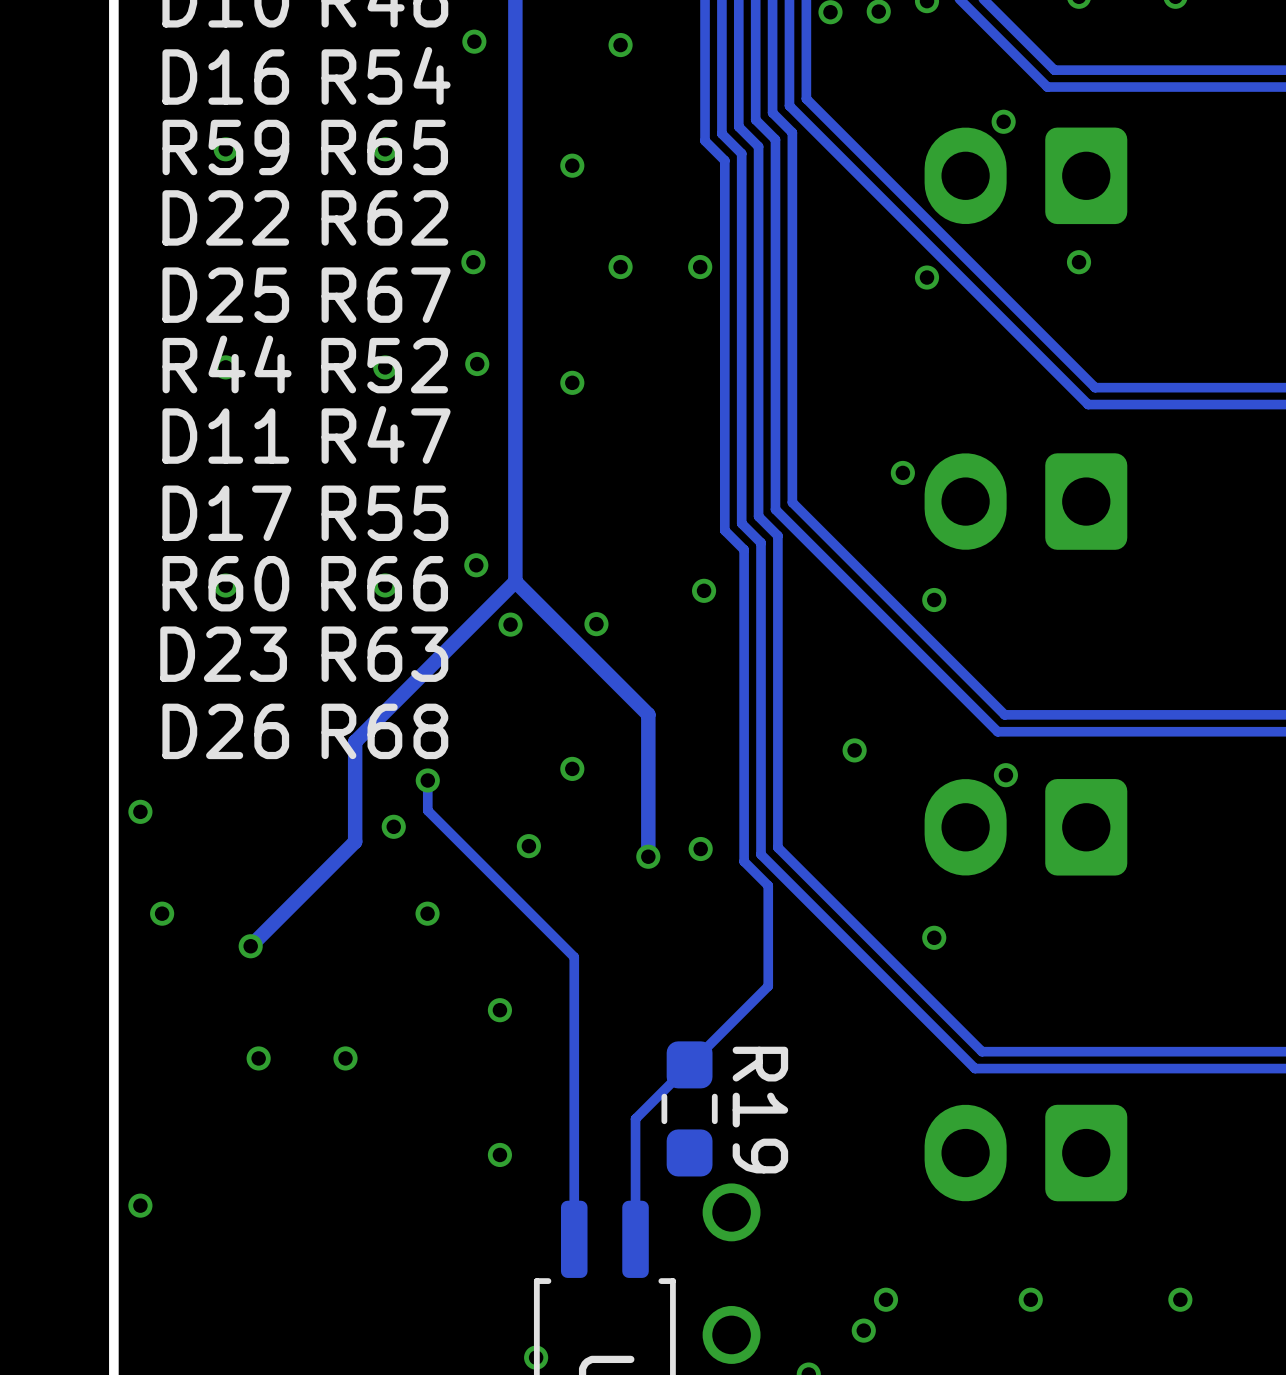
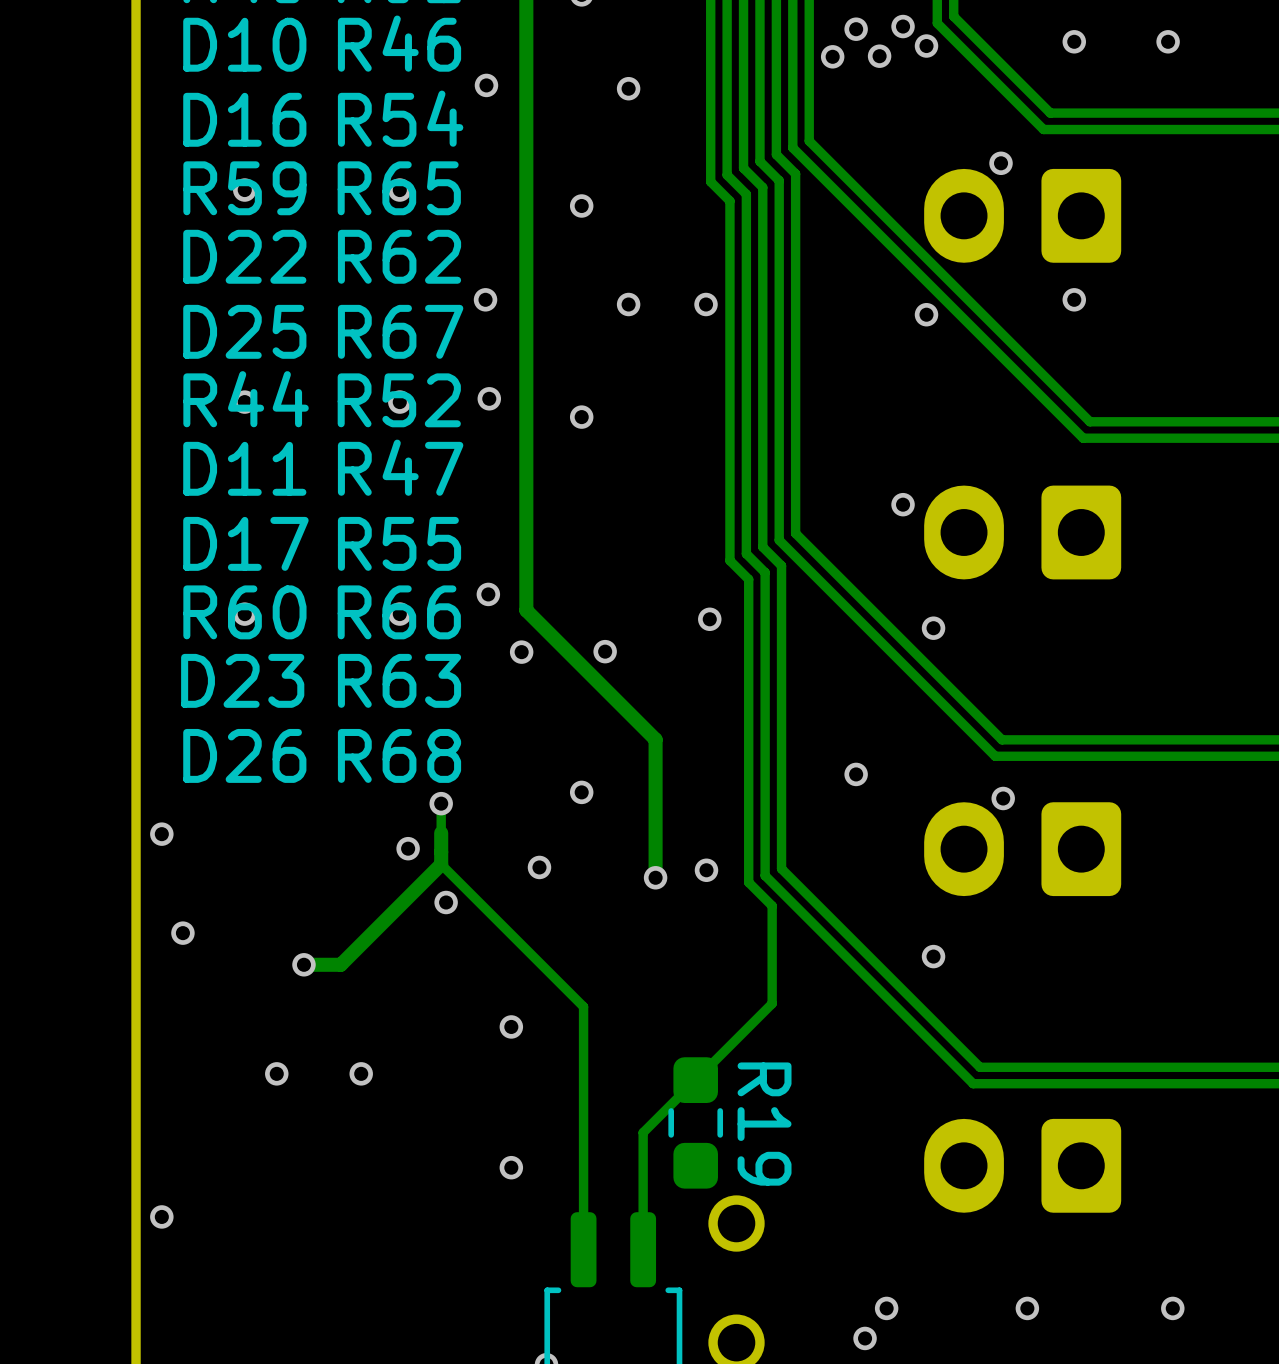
track: (515, 581) (355, 741) (355, 841) (250, 946) -> none
track: (427, 810) (574, 957) (574, 989) -> (441, 864) (583, 1006)
track: none -> (441, 832) (441, 864)
track: none -> (441, 864) (340, 964) (303, 964)
via position: (427, 913) -> (446, 902)
via position: (250, 946) -> (303, 964)

